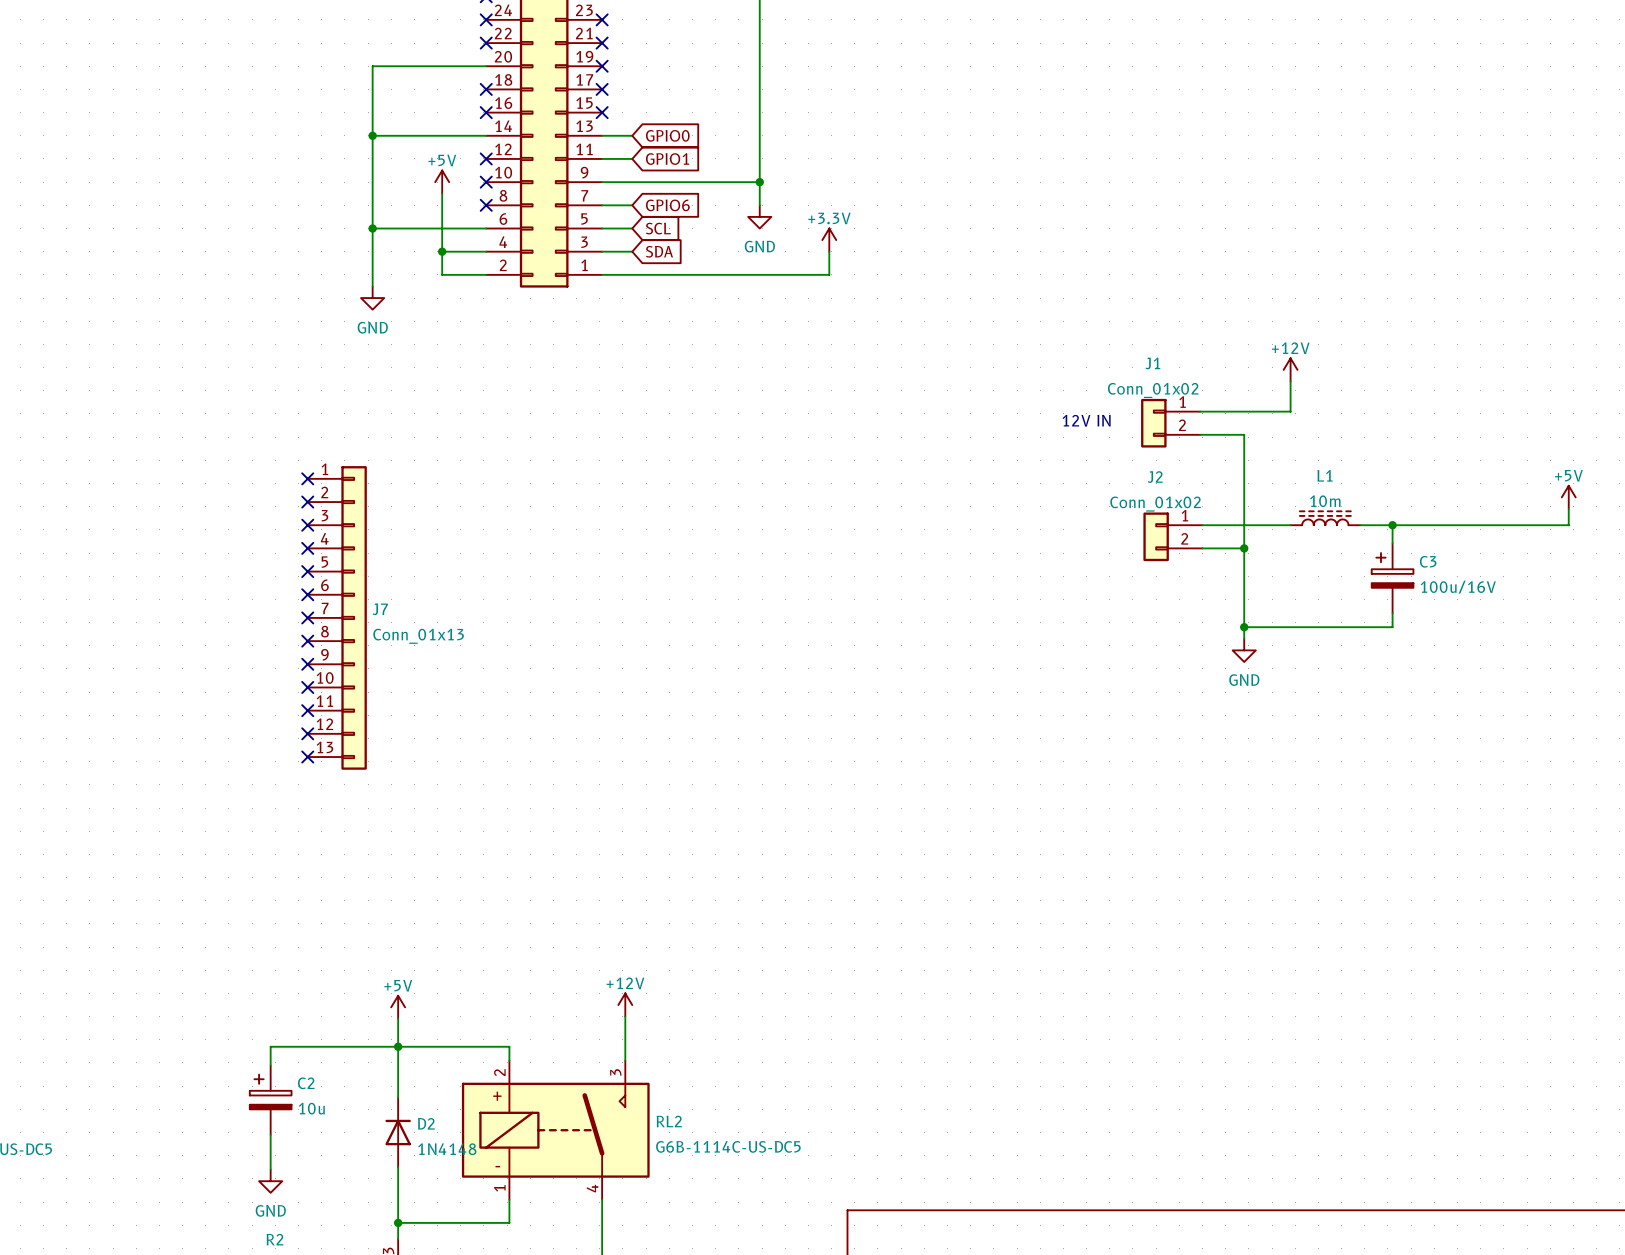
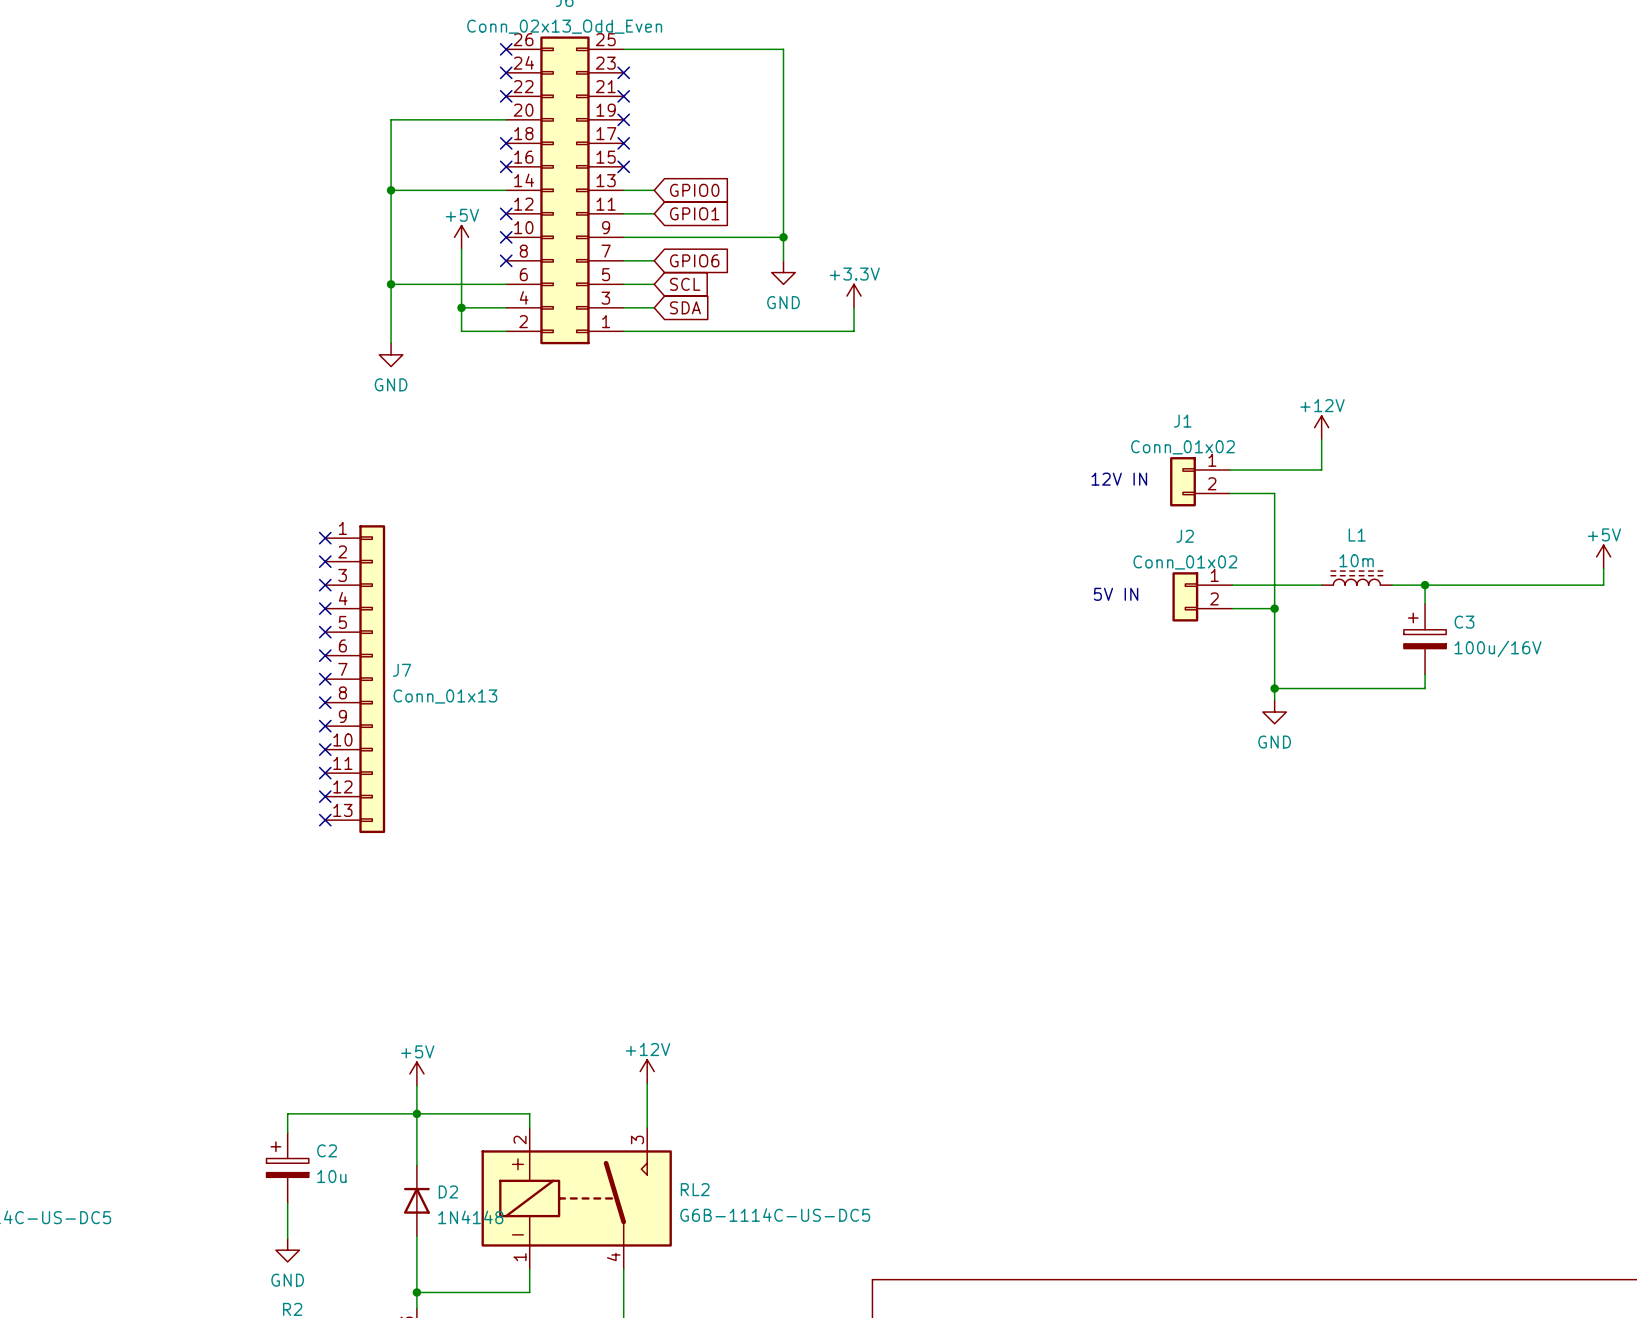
text: none -> 5V IN (1116, 594)

